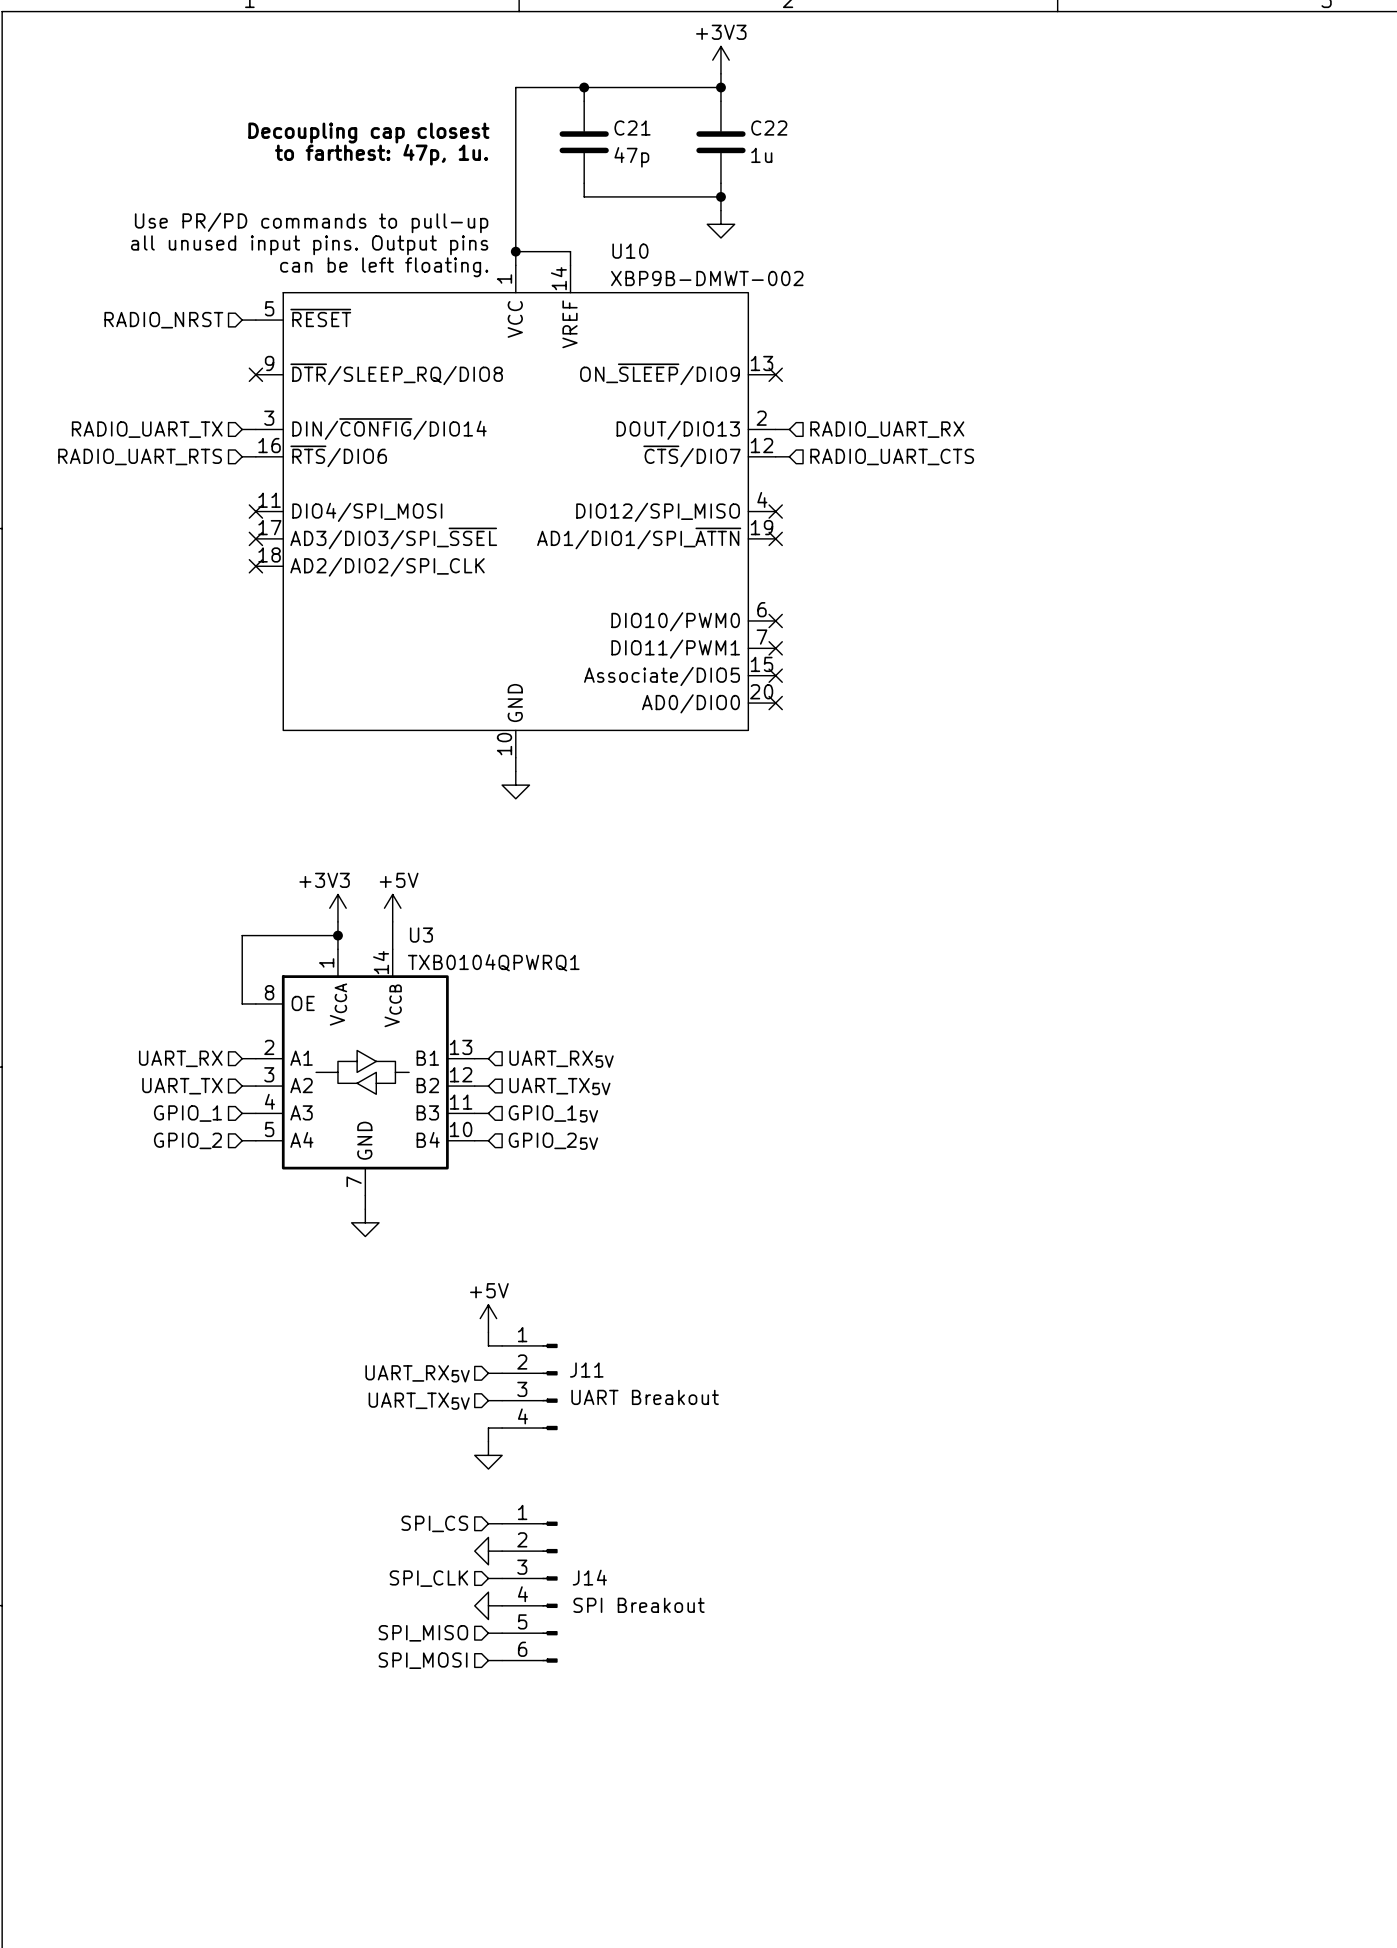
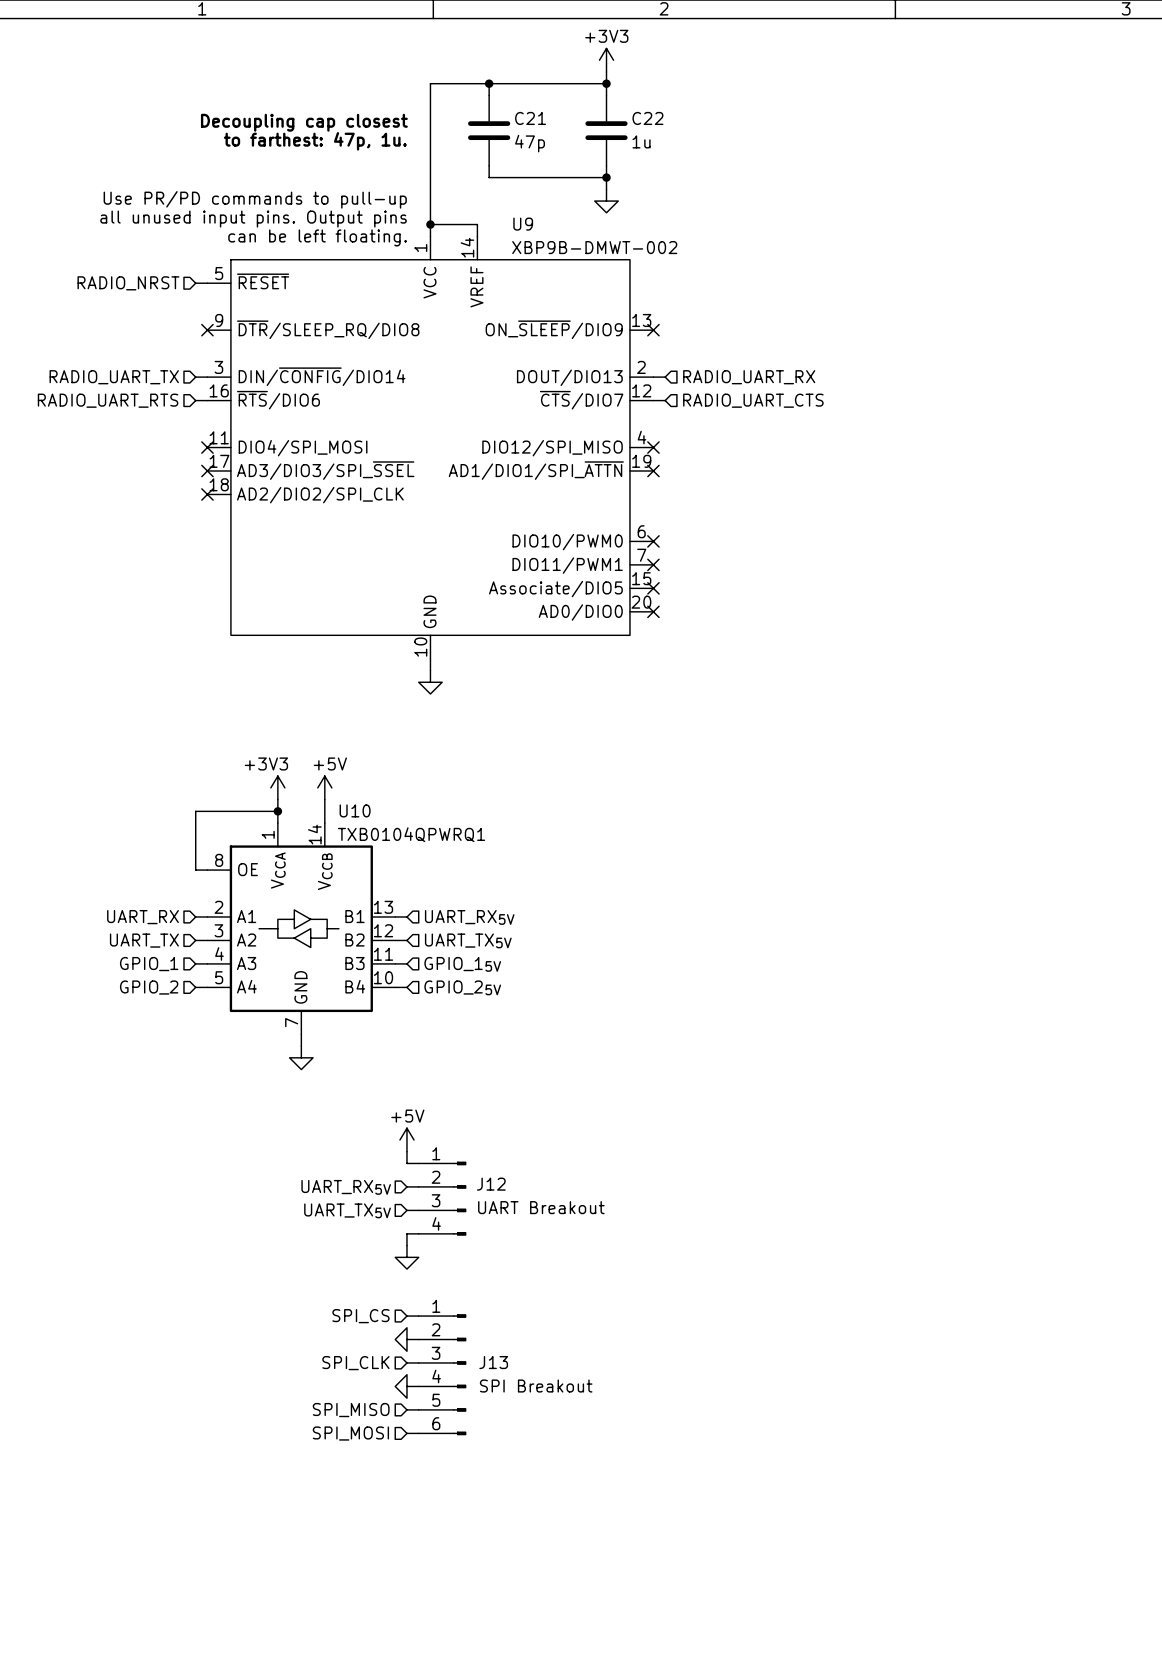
U10 name: U10 (630, 251) -> U9 (523, 224)
U3 name: U3 (421, 935) -> U10 (355, 810)
J11 name: J11 (586, 1370) -> J12 (491, 1184)
J14 name: J14 (589, 1577) -> J13 (493, 1362)

